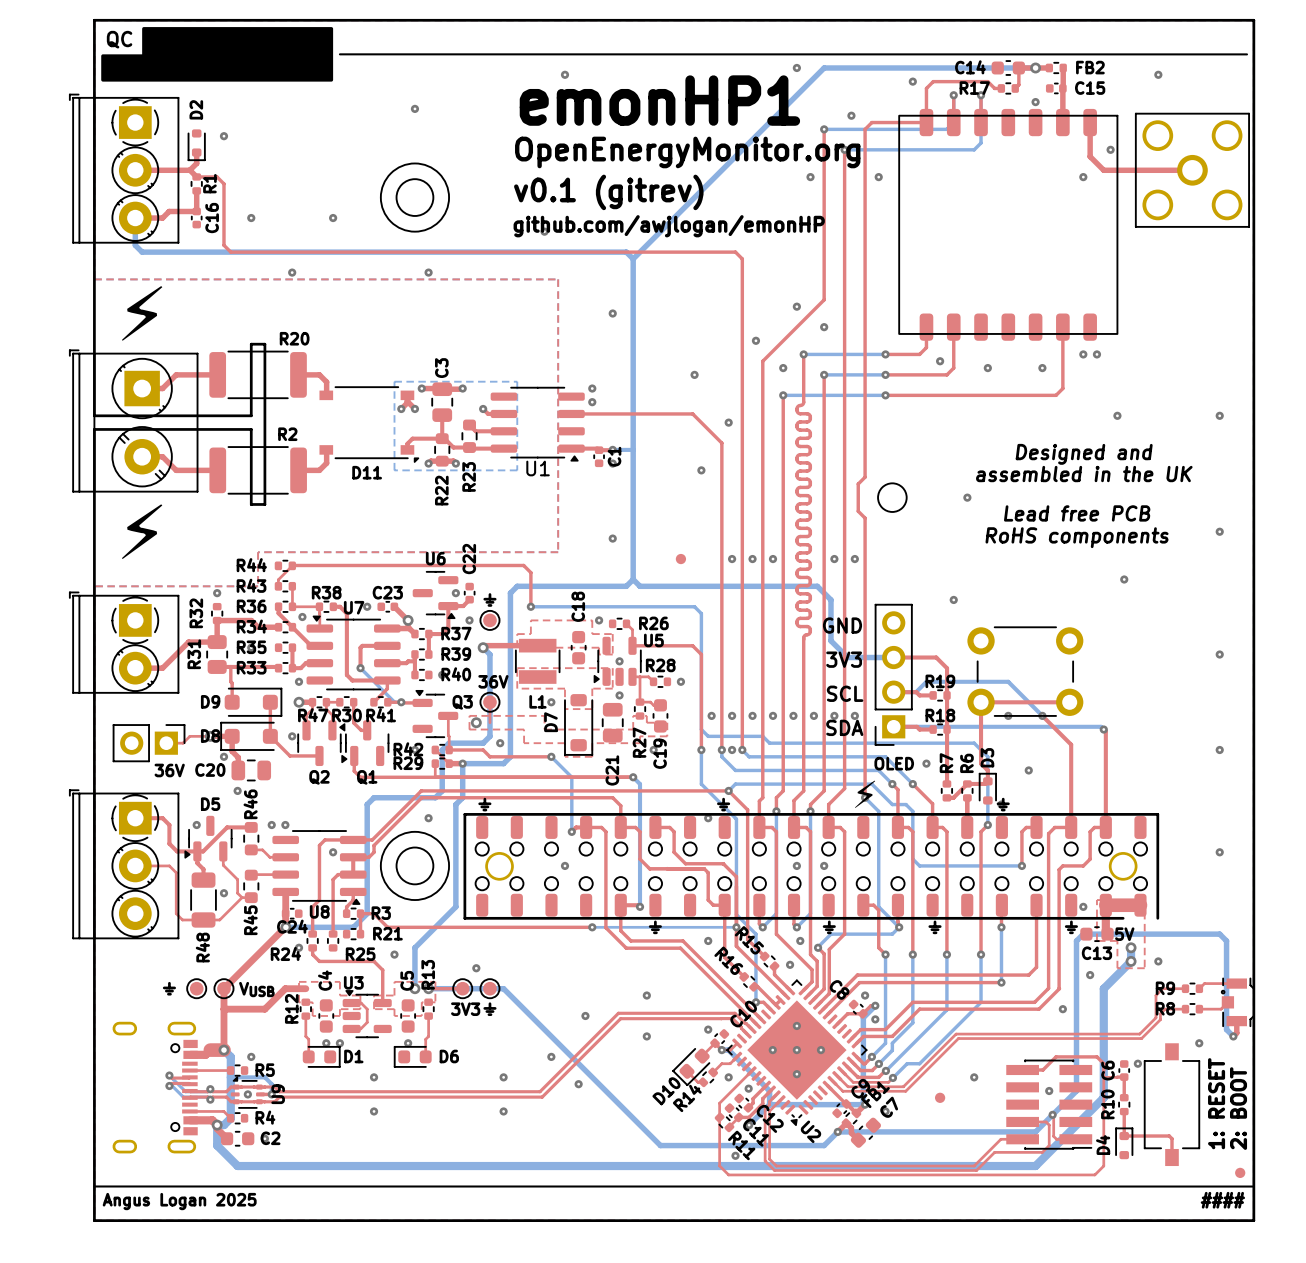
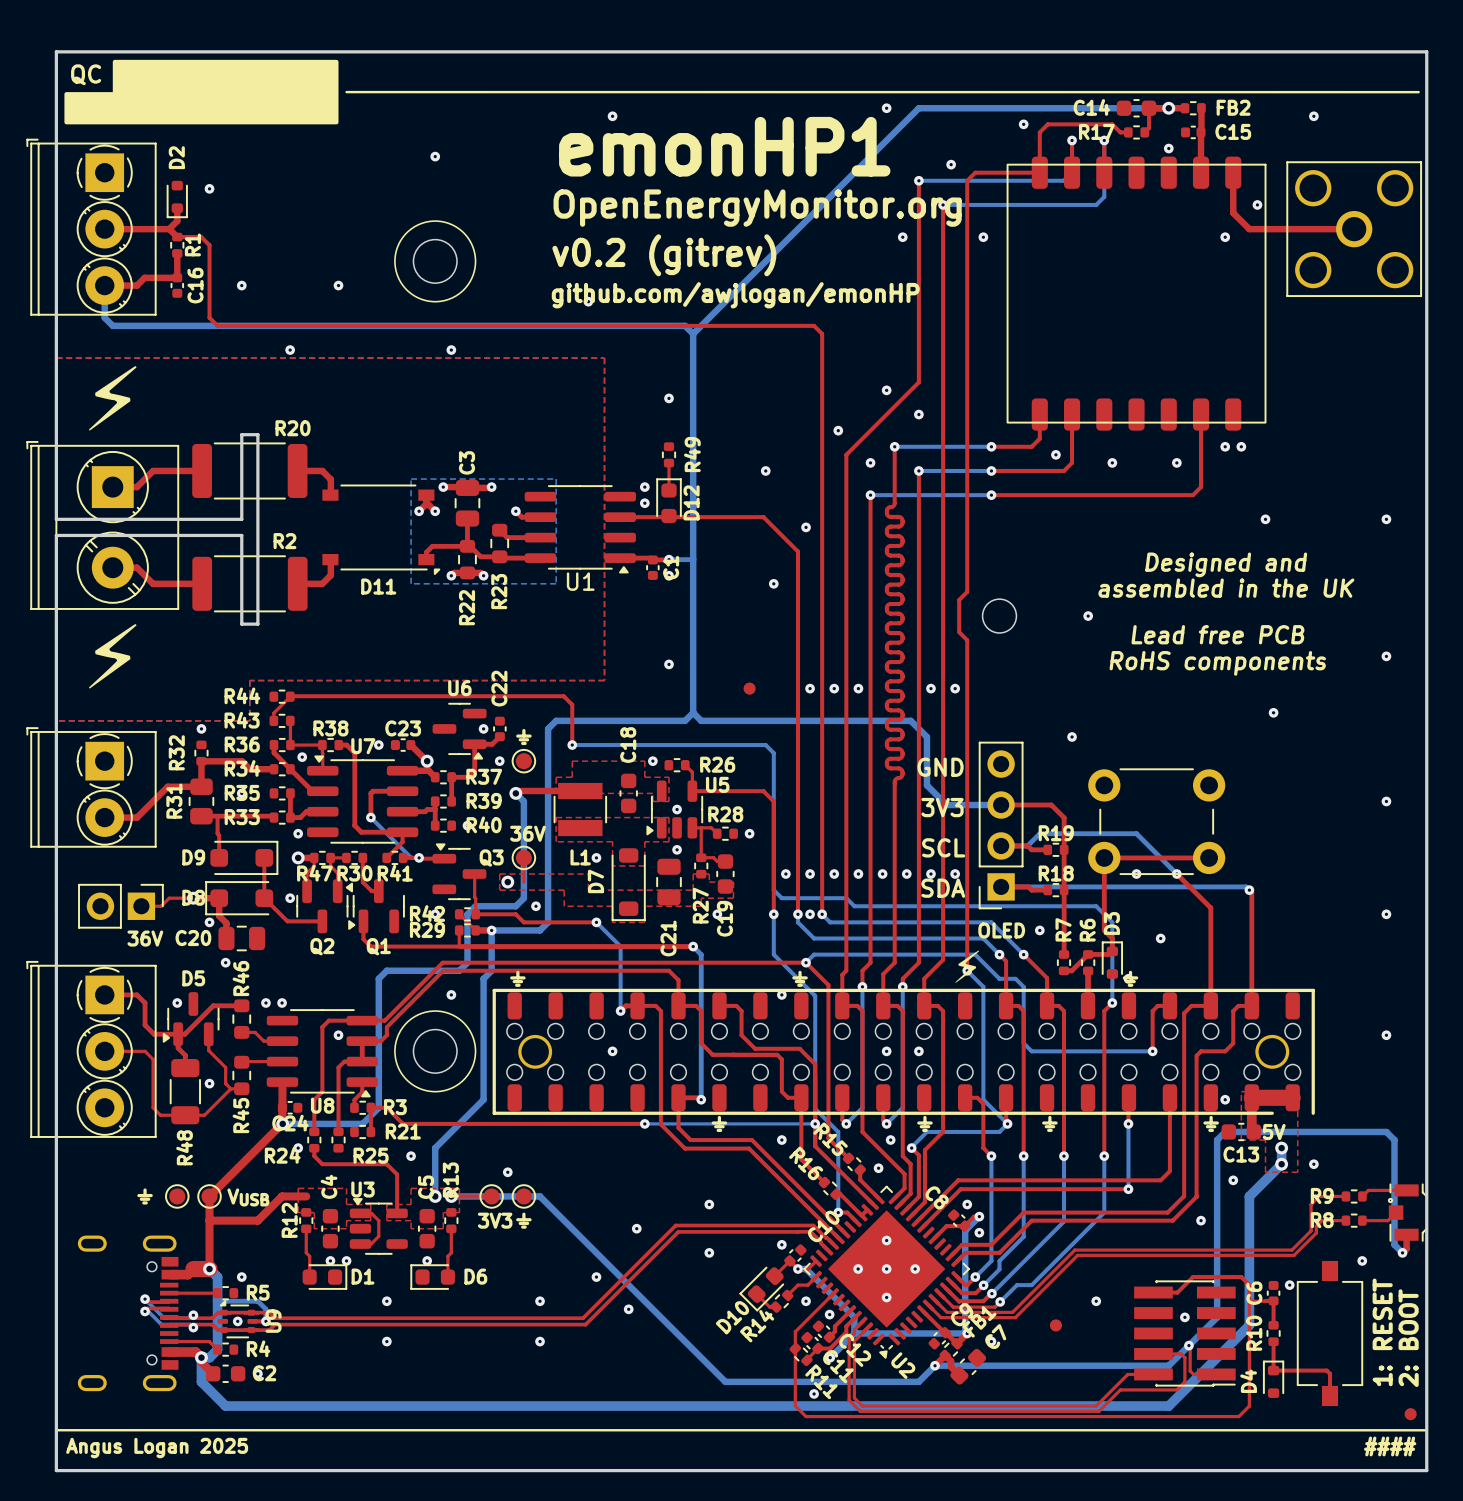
text: v0.1 (gitrev) (608, 192) -> v0.2 (gitrev) (664, 255)
R49: none -> (669, 454)
top track: none -> (669, 463) (669, 490)
D12: none -> (669, 500)

